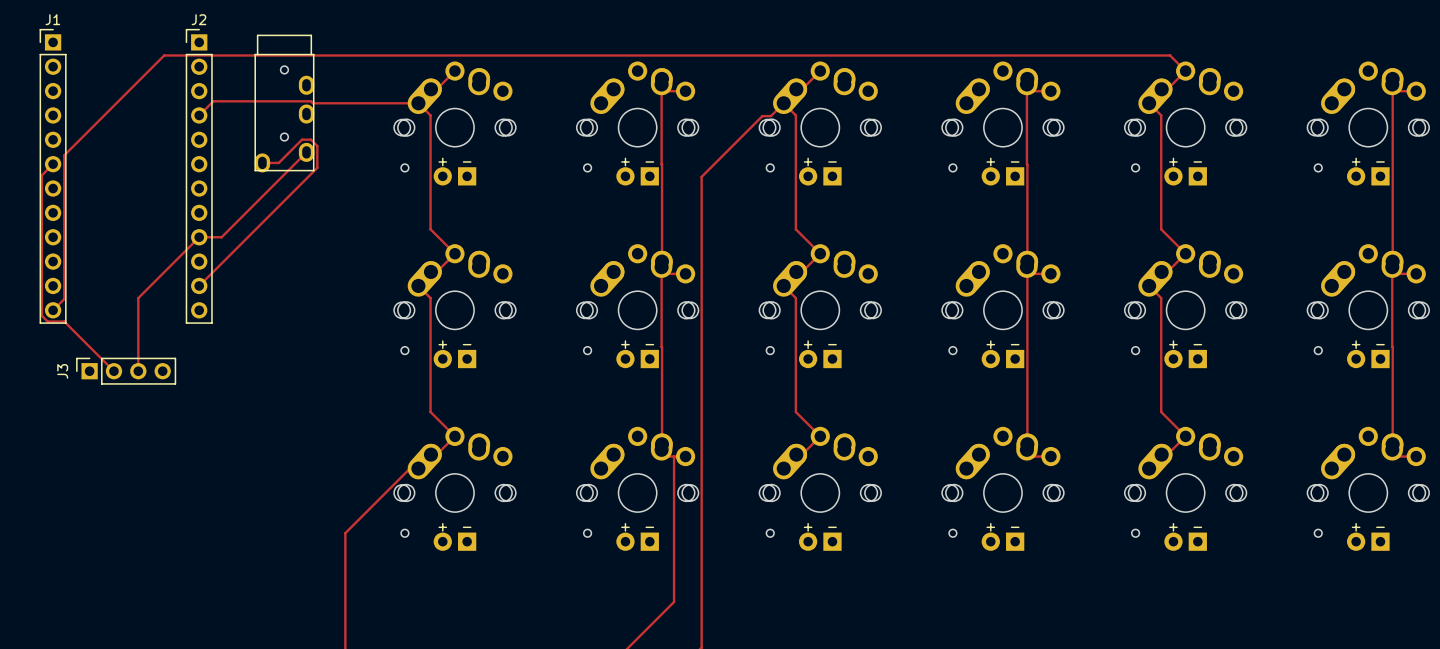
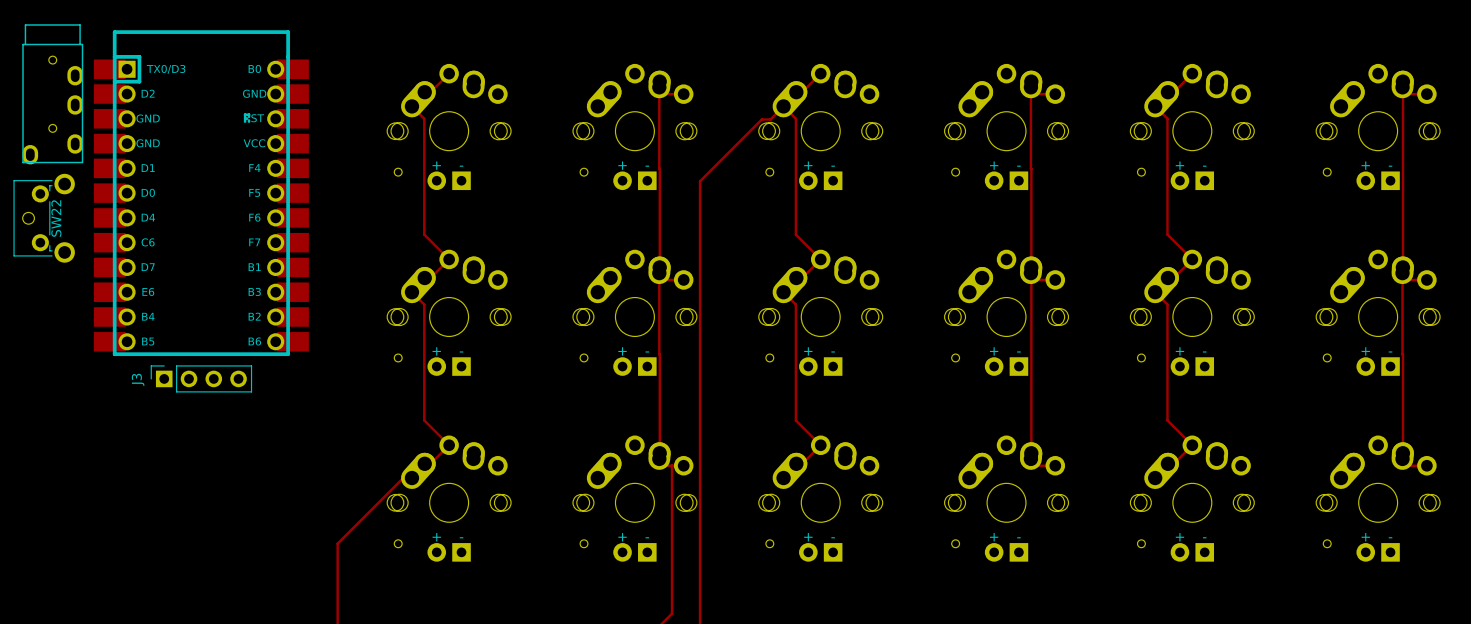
track: (1185, 71) (1170, 55) (164, 55) (64, 155) (64, 299) (53, 310) -> none
part position: (284, 103) -> (52, 94)
track: (418, 103) (213, 101) (199, 115) -> none
track: (306, 152) (221, 237) (199, 237) (138, 298) (138, 371) -> none
track: (262, 162) (278, 162) (302, 139) (310, 139) (317, 145) (317, 167) (199, 285) -> none
track: (53, 164) (41, 175) (41, 315) (47, 321) (64, 321) (113, 371) -> none
J1: (53, 176) -> none
J2: (199, 176) -> none
part: none -> (201, 193)
SW22: none -> (44, 218)
J3 position: (126, 371) -> (201, 378)

